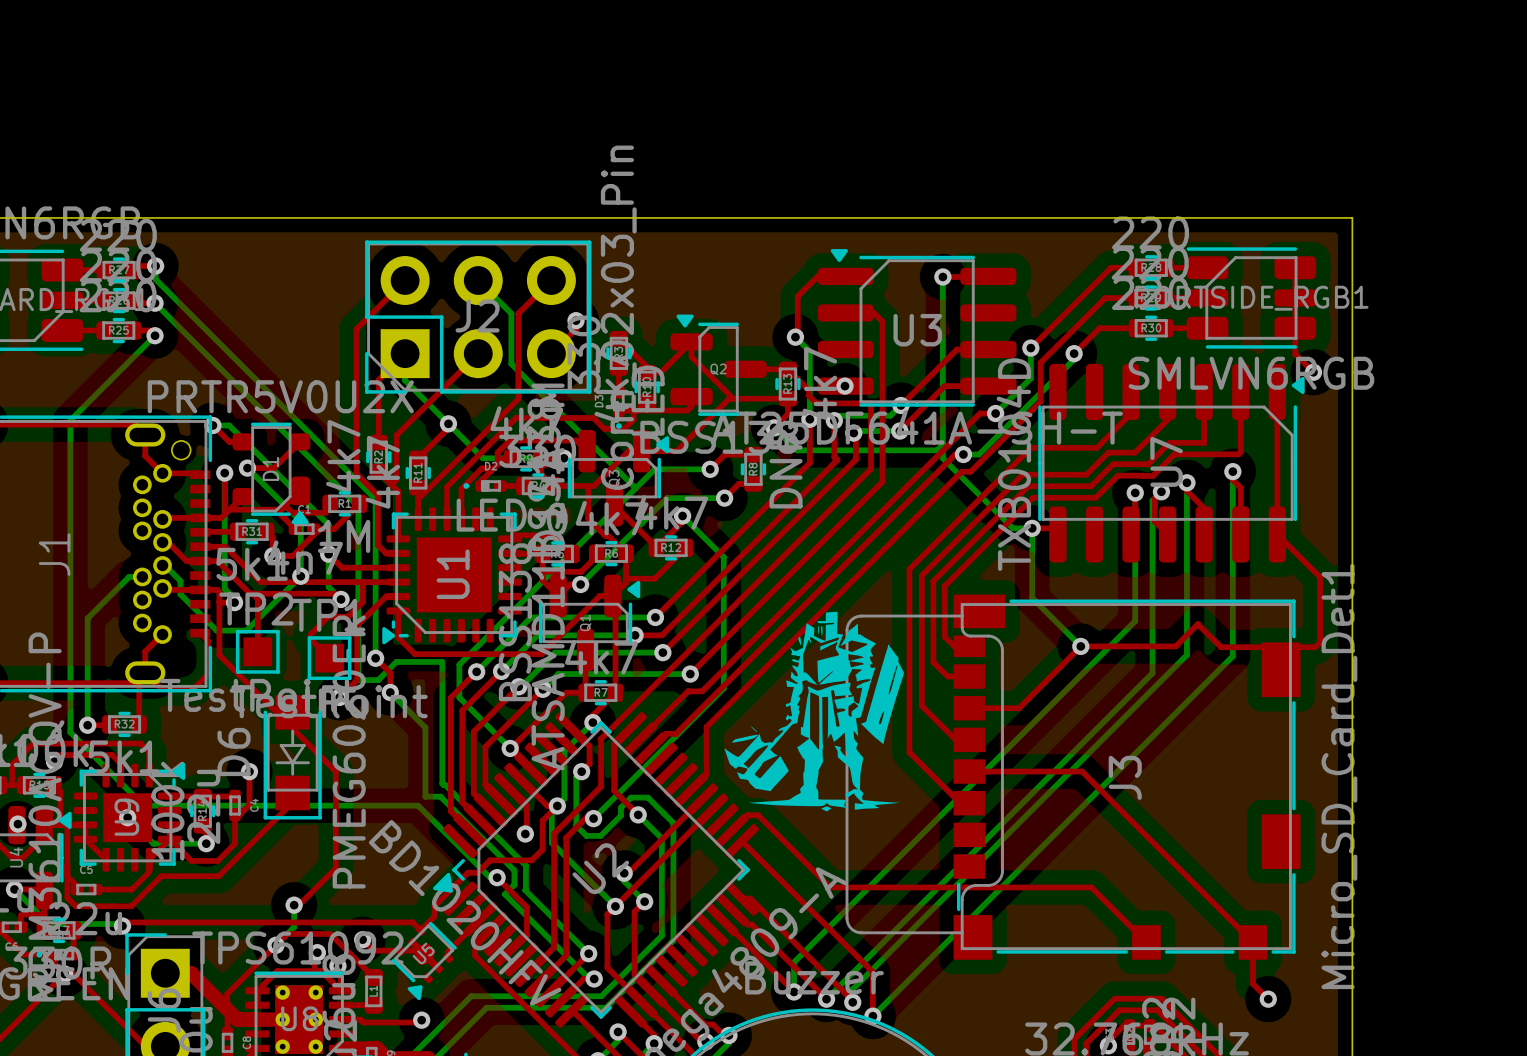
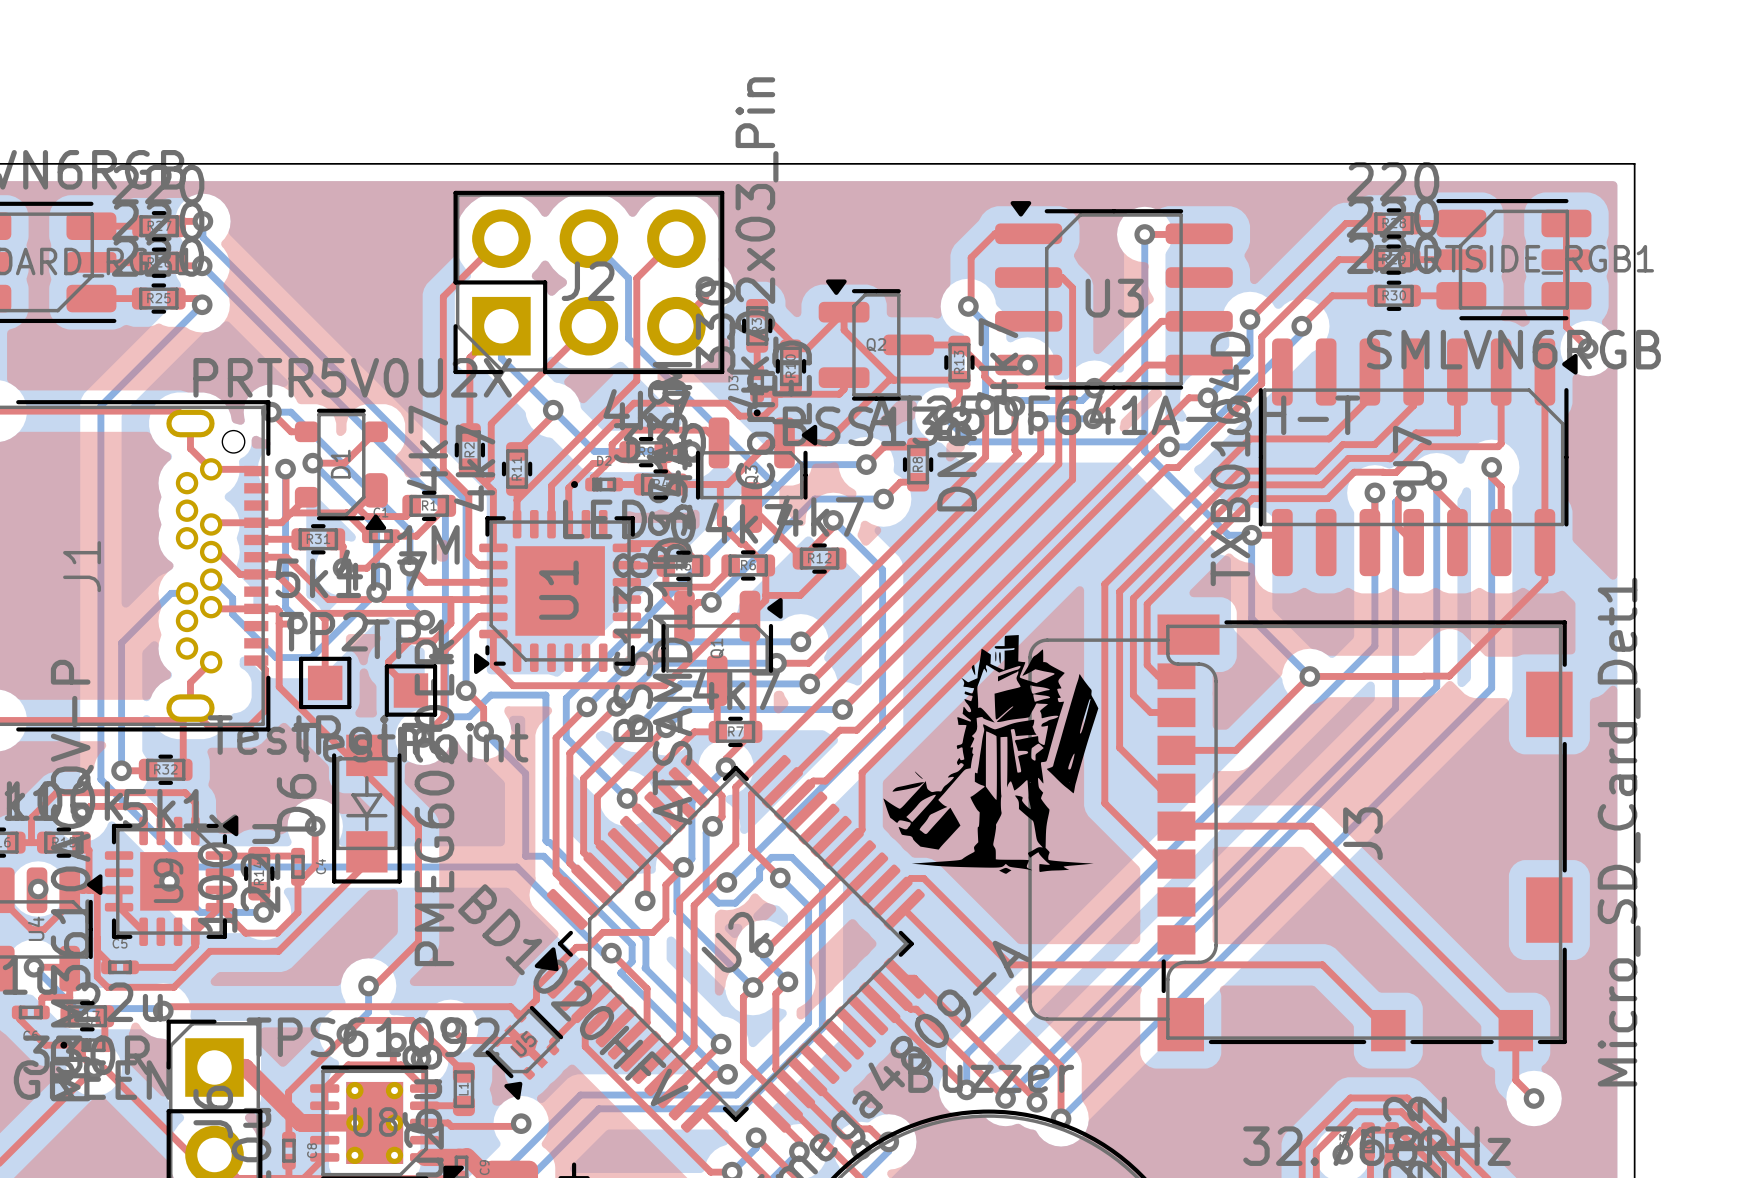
top track: (1277, 534) (1320, 577) (1320, 642) (1315, 647) (1220, 647) (1197, 624) (1175, 646) -> (1544, 542) (1544, 580) (1449, 676) (1423, 676)

